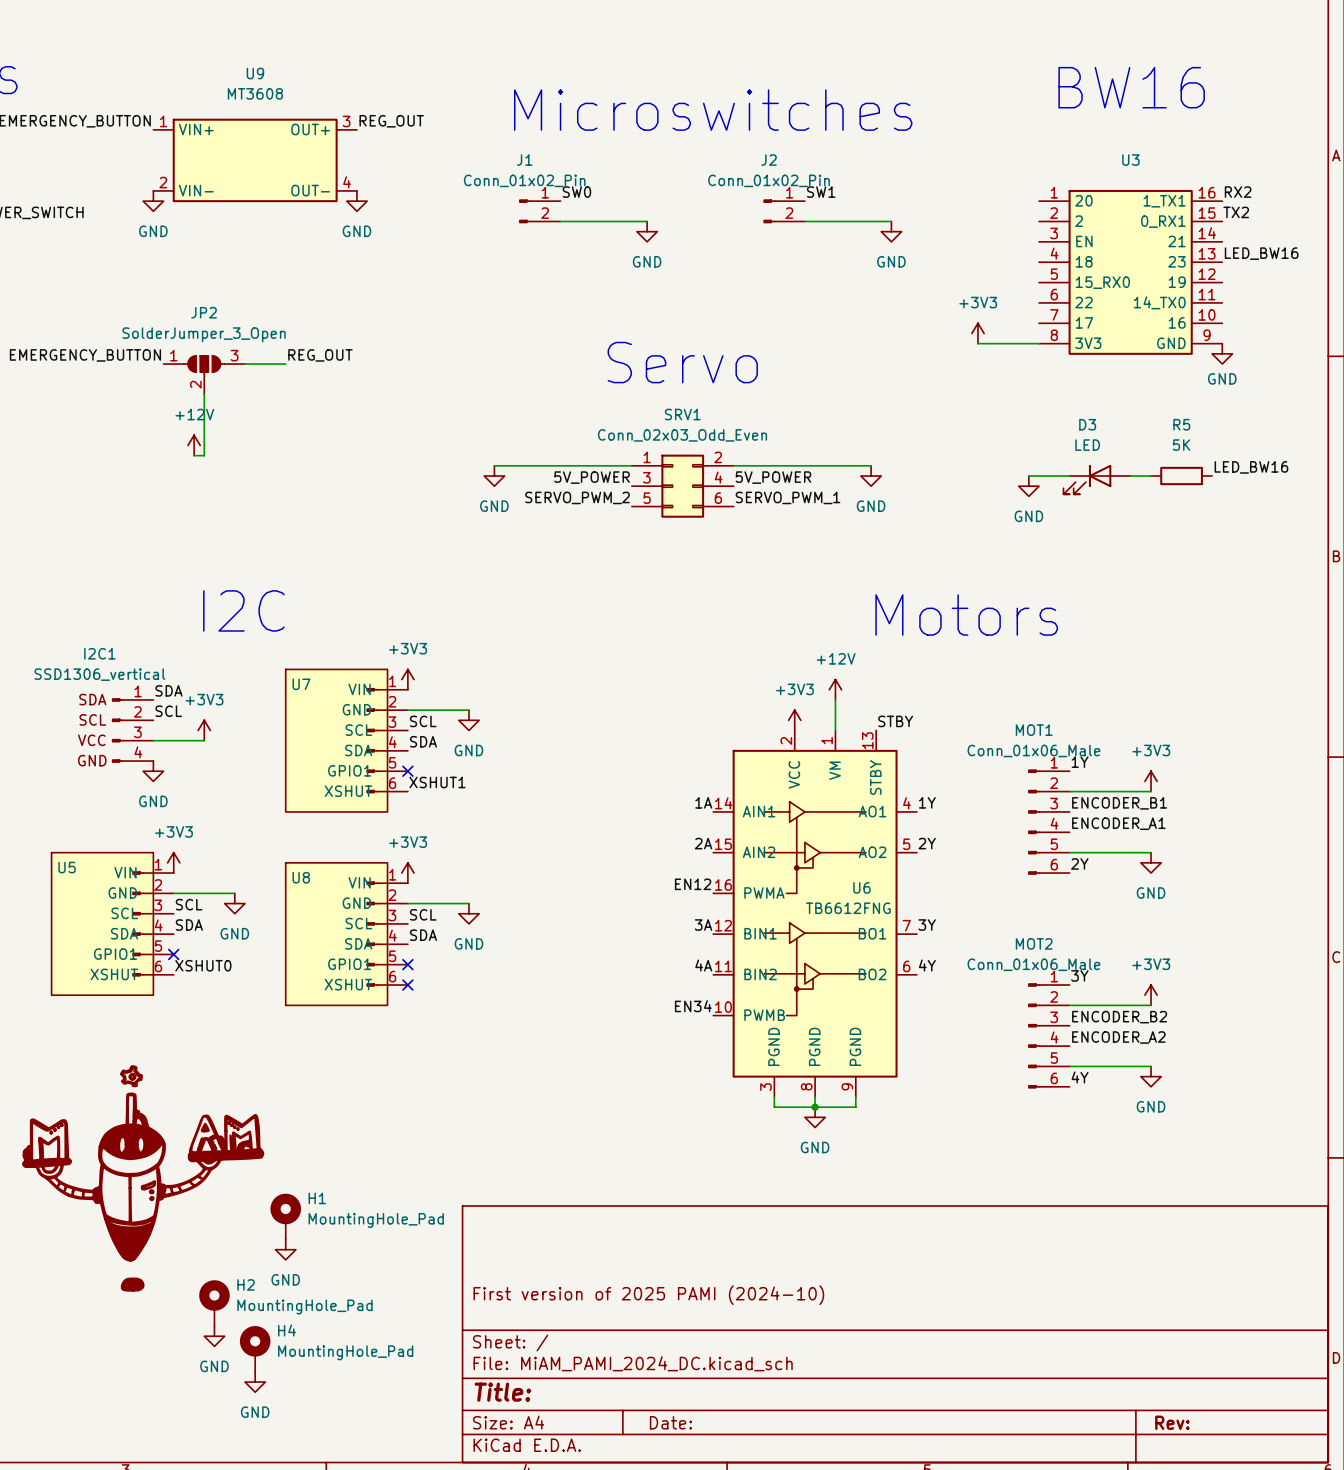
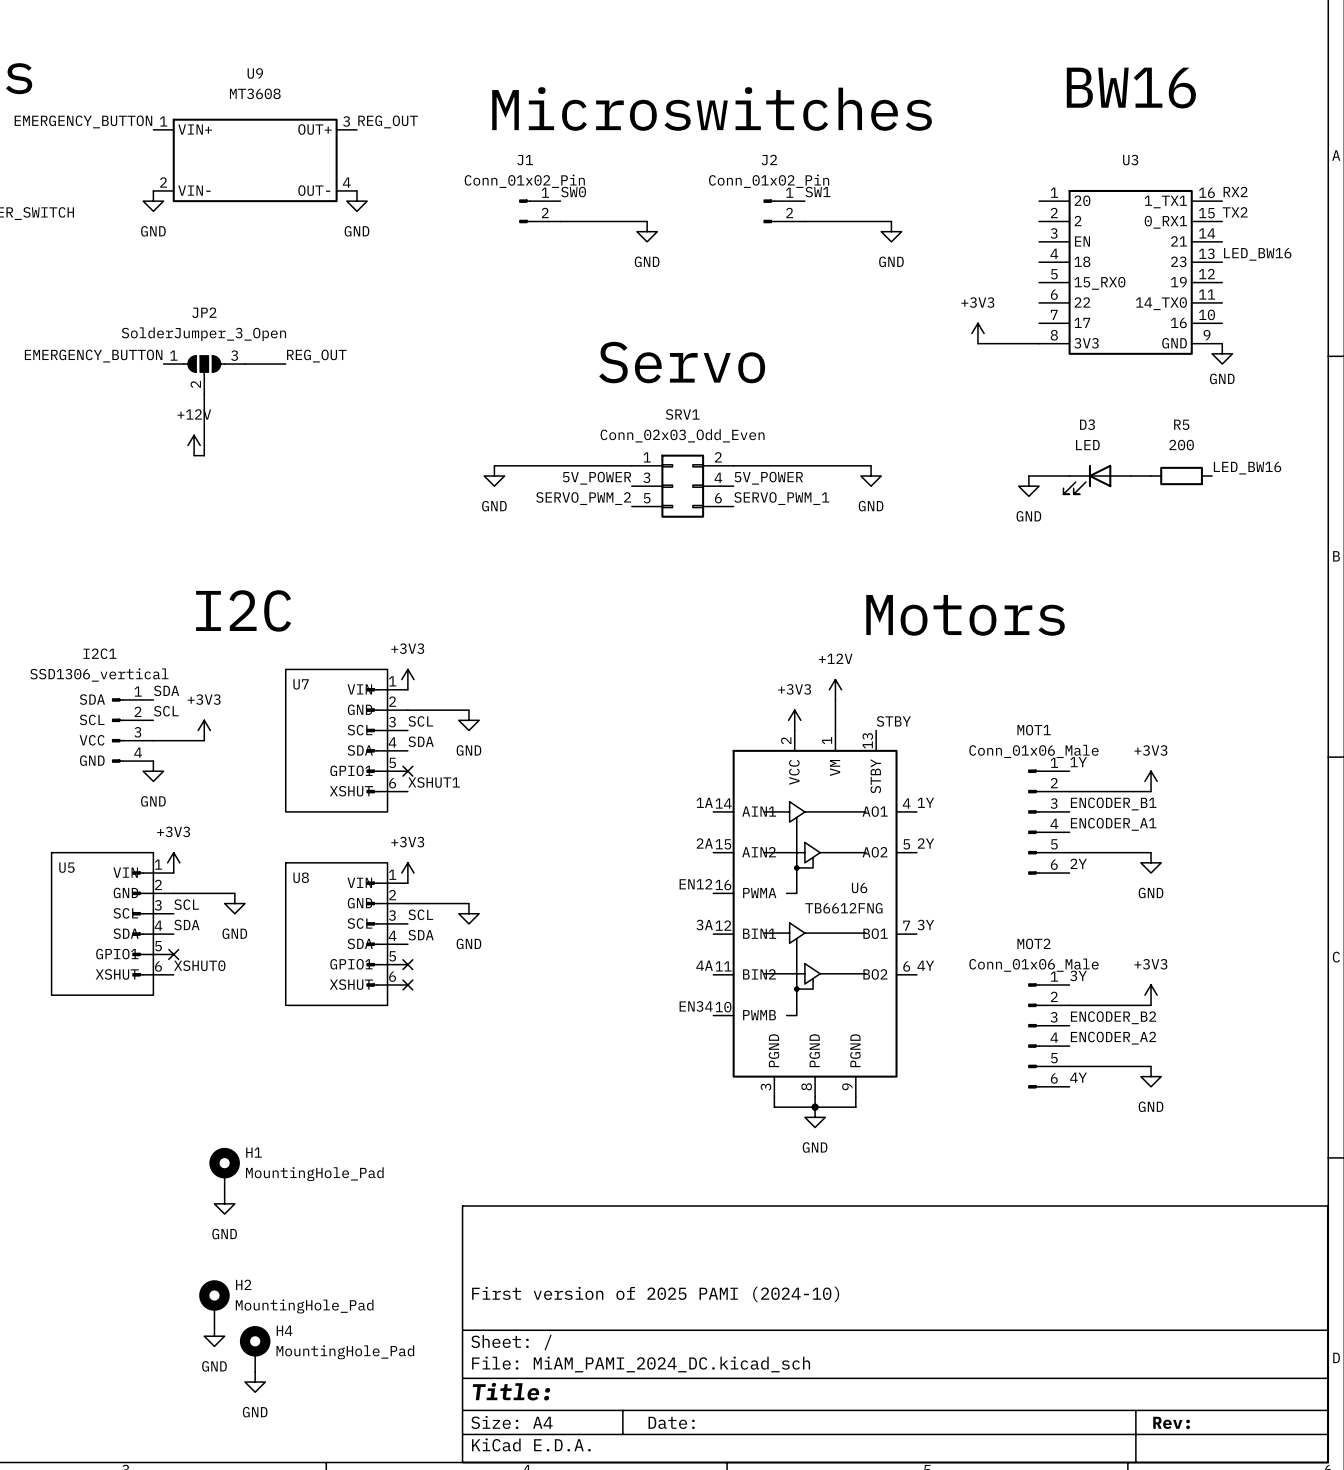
R5 value: 5K (1181, 445) -> 200 (1181, 445)
power symbol: (143, 1178) -> none
H1 position: (285, 1216) -> (224, 1170)
power symbol position: GND (285, 1249) -> GND (224, 1203)

